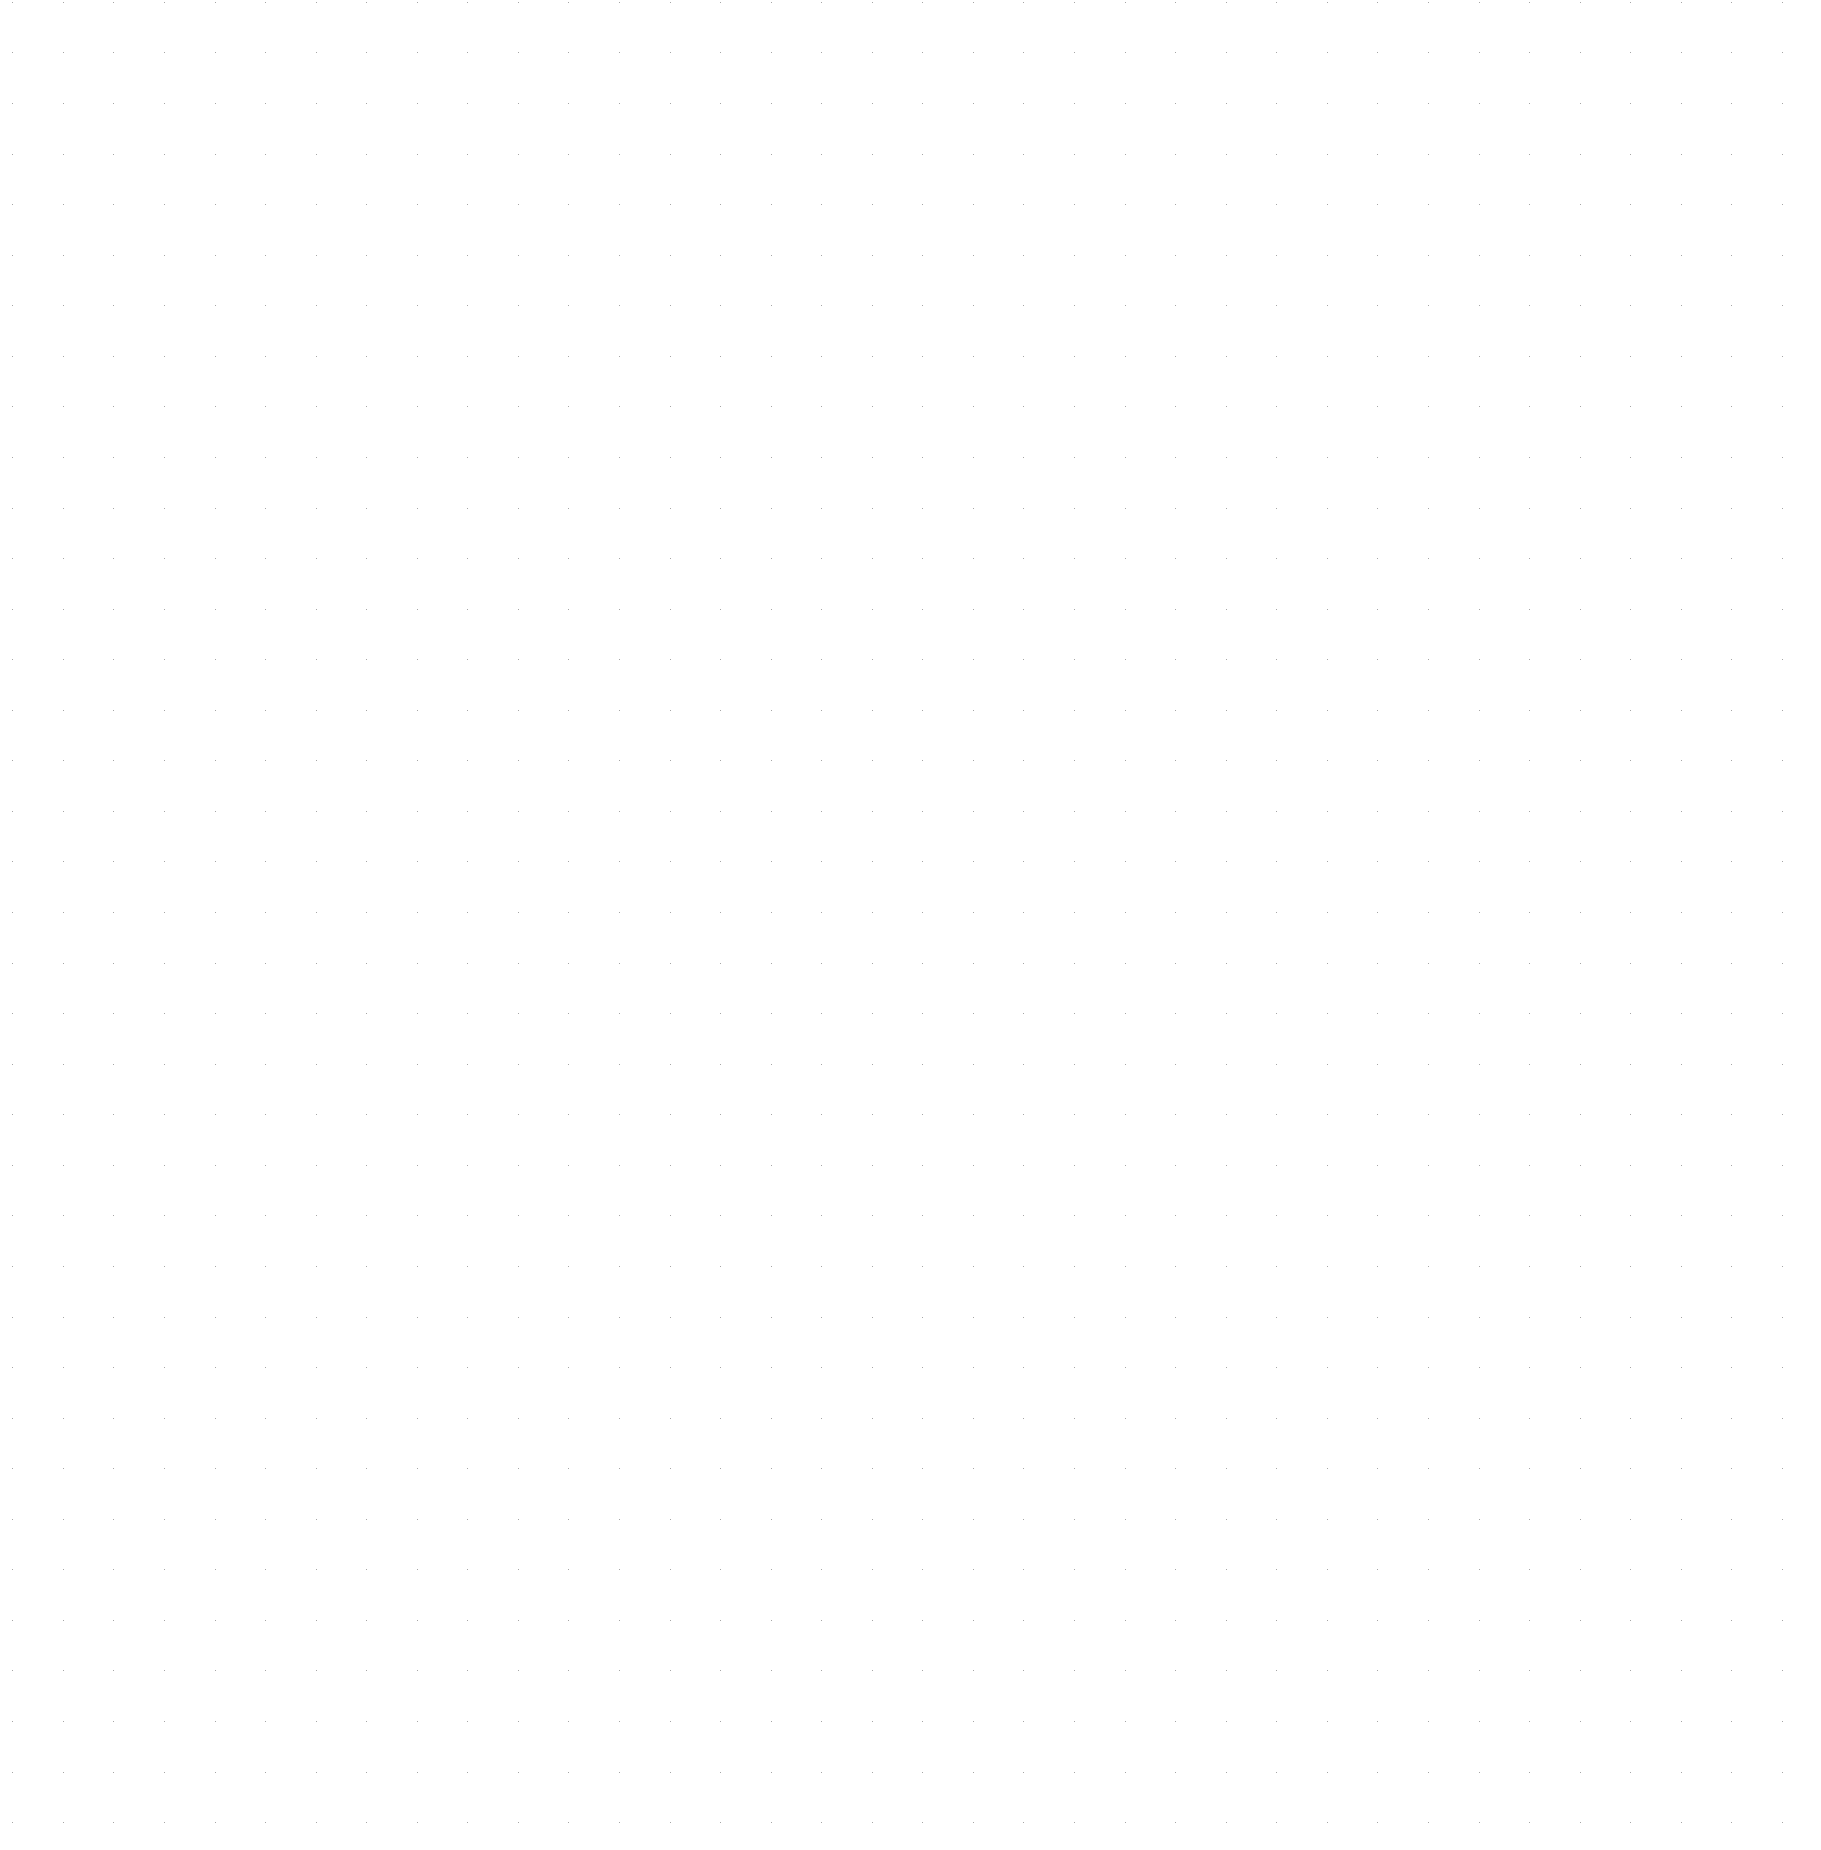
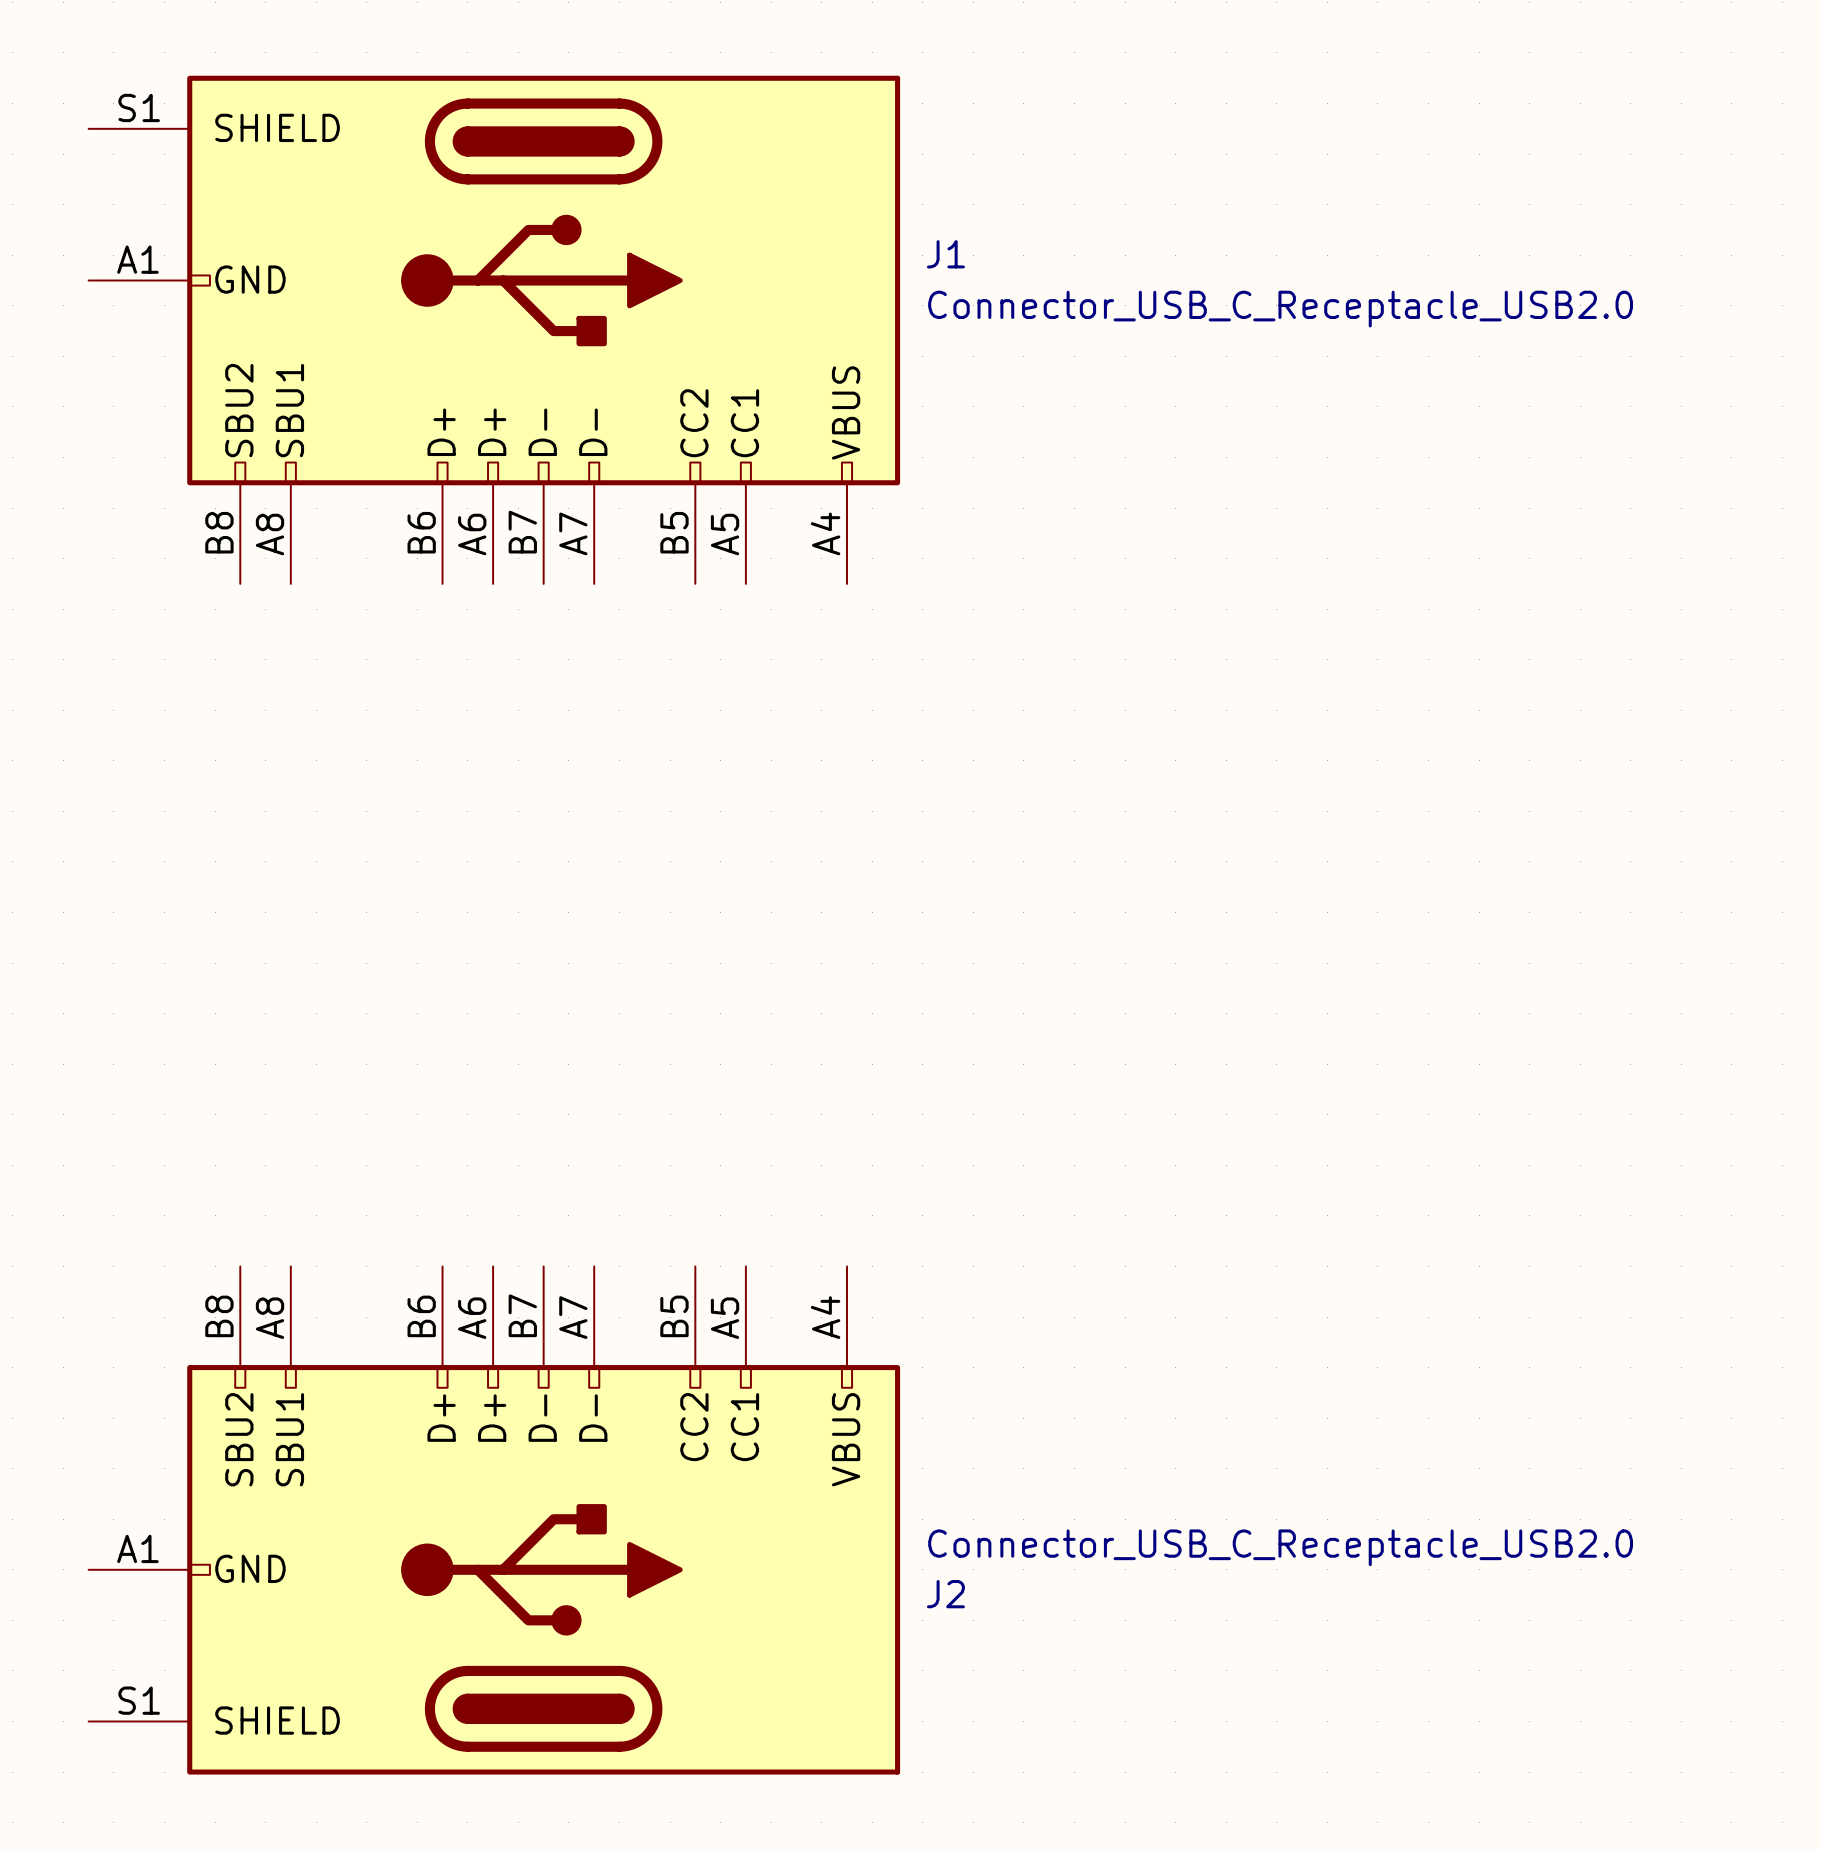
J1: none -> Connector_USB_C_Receptacle_USB2.0 (494, 329)
J2: none -> Connector_USB_C_Receptacle_USB2.0 (494, 1520)

